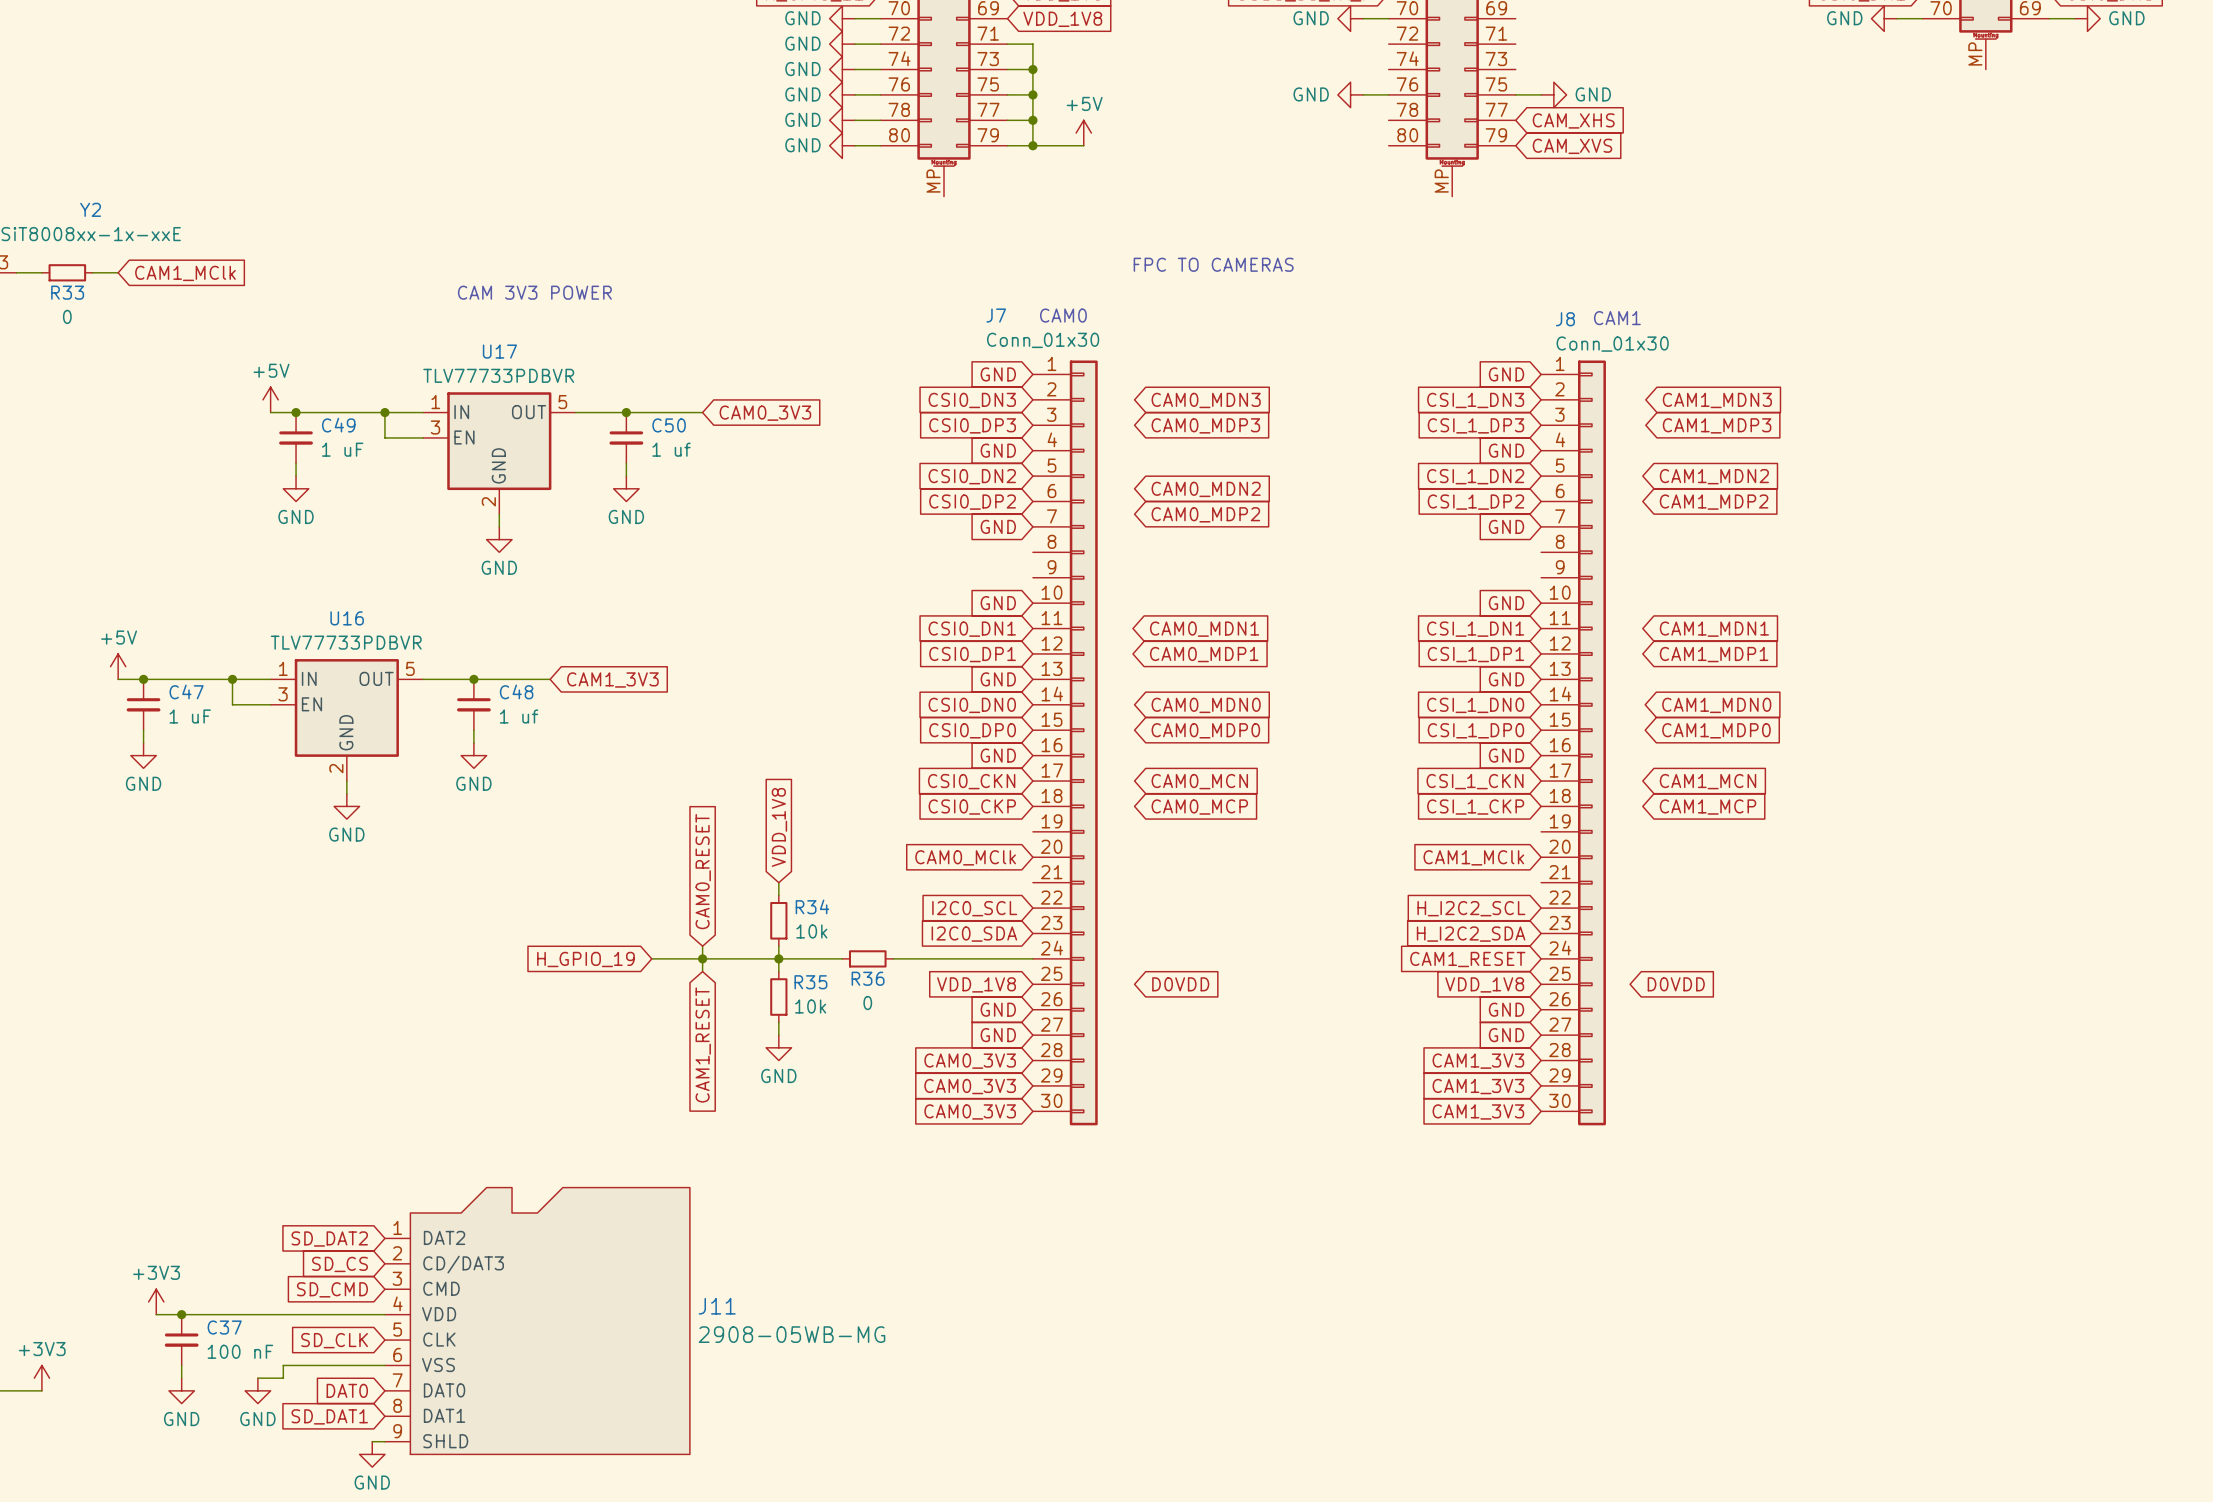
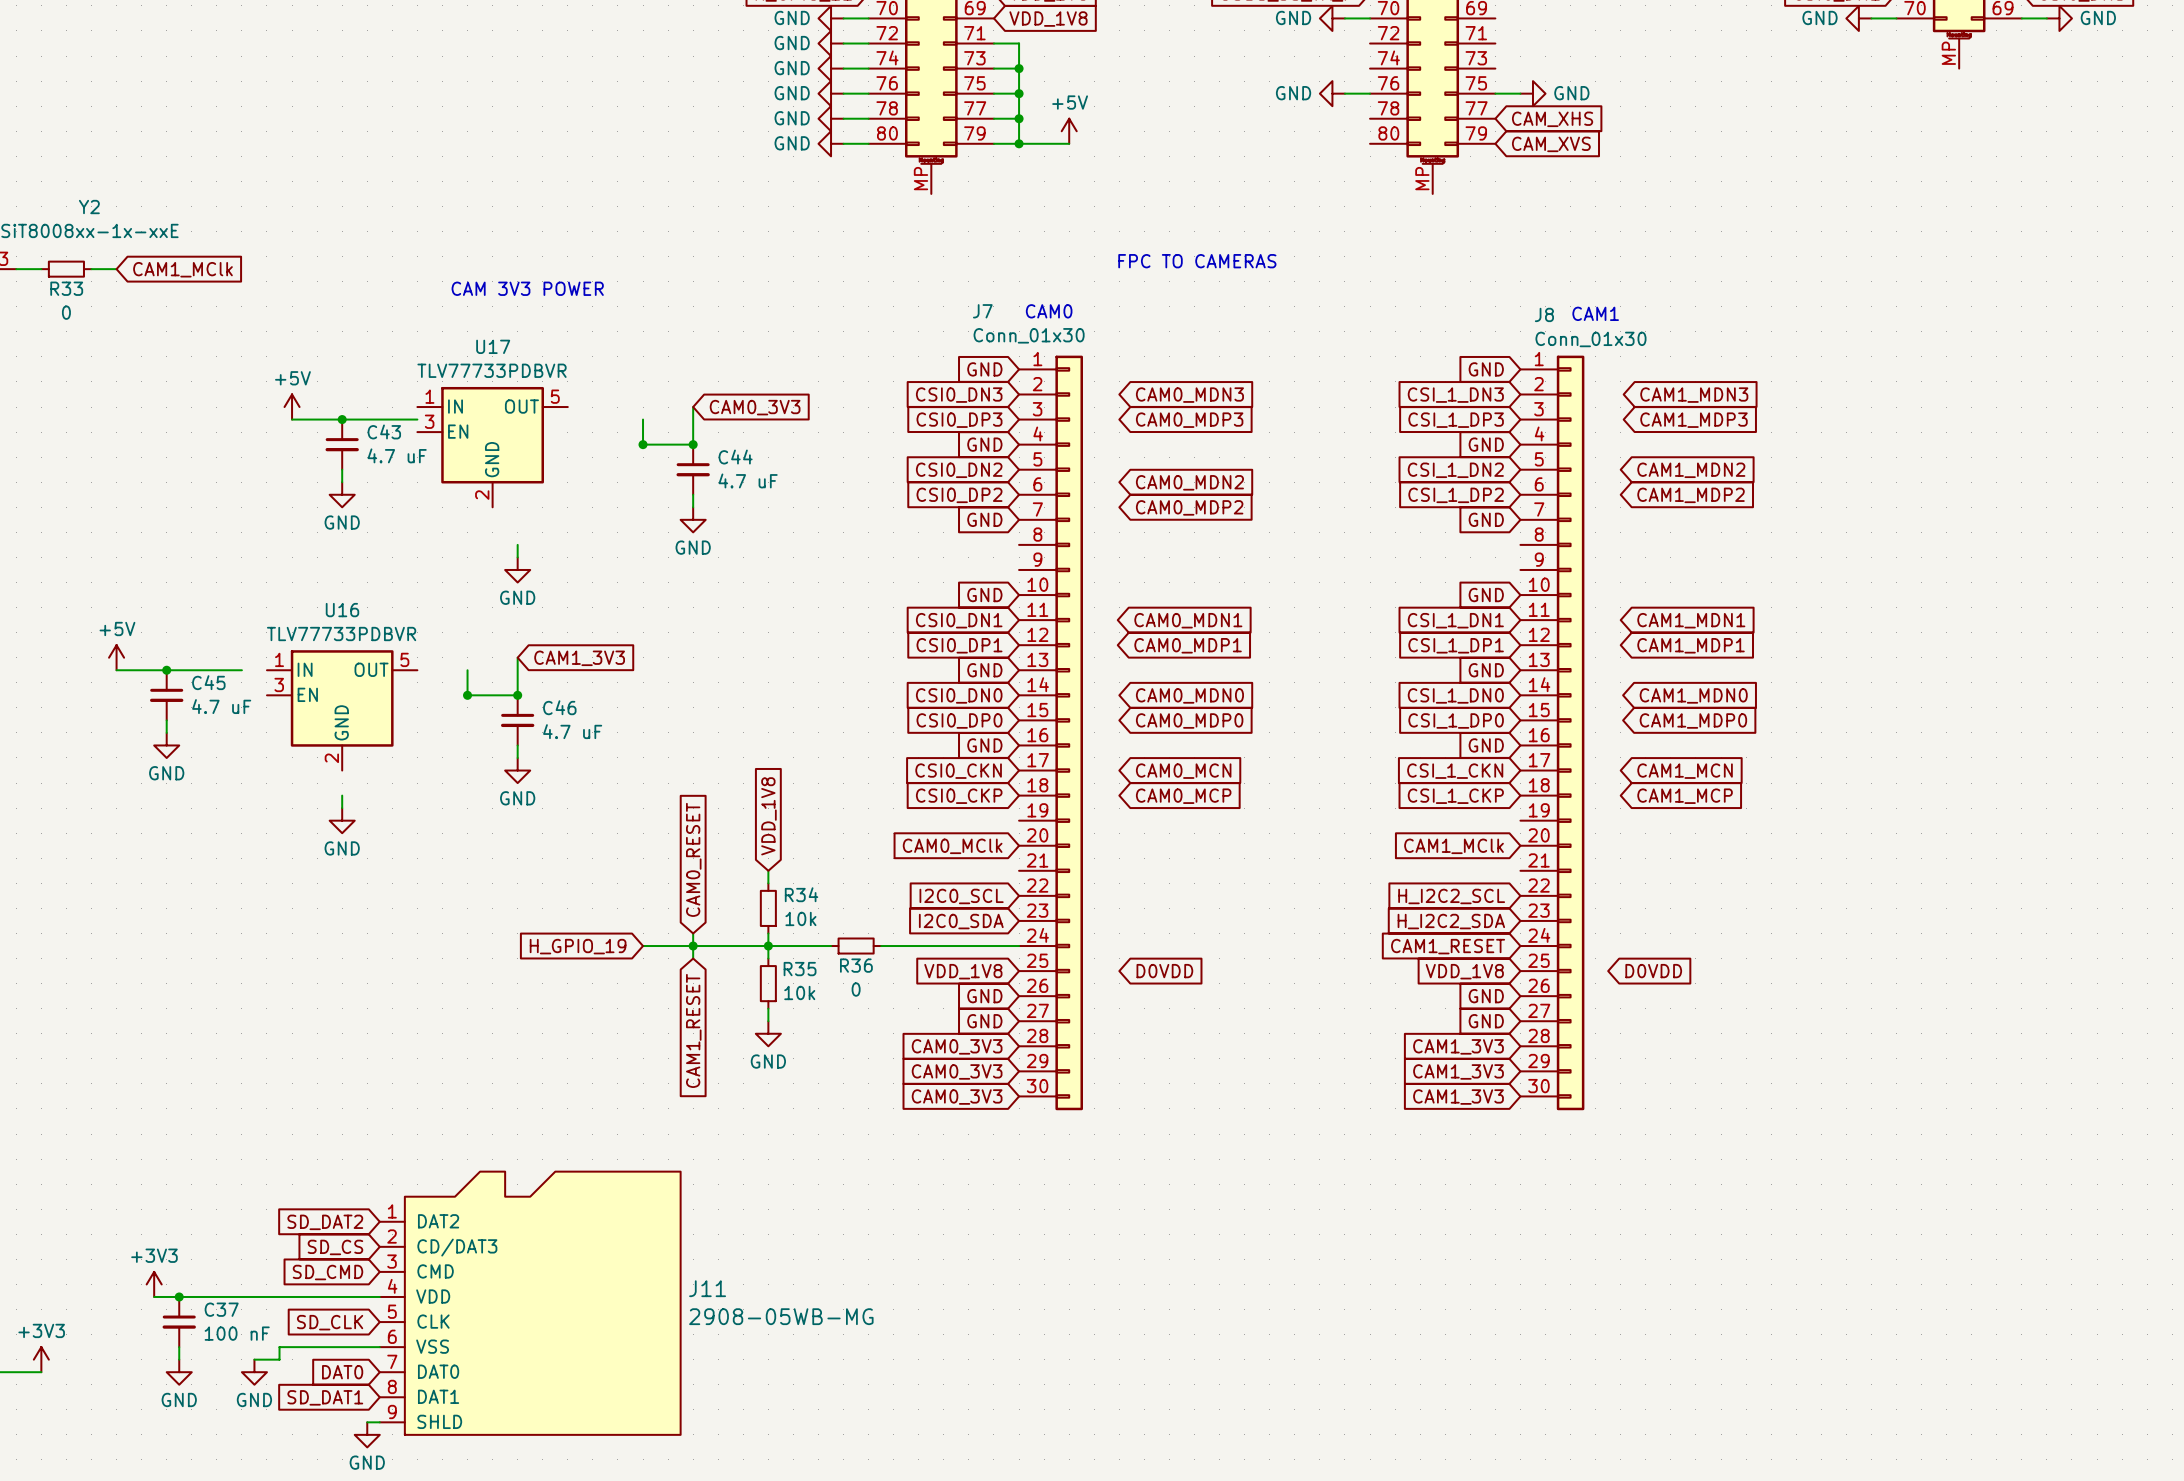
power symbol position: +5V (270, 399) -> +5V (292, 407)
wire: (270, 412) (423, 412) -> none
junction: (296, 412) -> none
wire: (384, 412) (384, 437) (423, 437) -> none
junction: (384, 412) -> none
wire: (575, 412) (702, 412) -> (643, 419) (643, 444) (693, 444) (693, 407)
junction: (626, 412) -> none
wire: none -> (292, 419) (417, 419)
junction: none -> (342, 419)
C49: 1 uF (296, 437) -> none
C50: 1 uf (626, 437) -> none
C43: none -> 4.7 uF (342, 444)
junction: none -> (643, 444)
junction: none -> (693, 444)
wire: (296, 463) (296, 476) -> (342, 469) (342, 482)
wire: (626, 463) (626, 476) -> (693, 494) (693, 507)
C44: none -> 4.7 uF (693, 469)
power symbol position: GND (296, 488) -> GND (342, 494)
power symbol: GND (626, 488) -> none
wire: (499, 514) (499, 526) -> (517, 544) (517, 557)
power symbol: none -> GND (693, 519)
power symbol position: GND (499, 539) -> GND (517, 569)
wire: none -> (517, 657) (517, 695) (467, 695) (467, 670)
junction position: (143, 679) -> (166, 670)
wire: (232, 679) (232, 704) (270, 704) -> none
junction: (232, 679) -> none
wire: (245, 679) (270, 679) -> none
wire: (423, 679) (550, 679) -> none
junction position: (473, 679) -> (467, 695)
global label position: CAM1_3V3 (612, 679) -> CAM1_3V3 (579, 658)
C47: 1 uF (143, 704) -> none
C45: none -> 4.7 uF (166, 695)
C48: 1 uf (473, 704) -> none
junction: none -> (517, 695)
wire: (143, 730) (143, 742) -> (166, 720) (166, 732)
wire: (473, 730) (473, 742) -> (517, 745) (517, 757)
C46: none -> 4.7 uF (517, 720)
power symbol position: GND (143, 755) -> GND (166, 745)
power symbol position: GND (473, 755) -> GND (517, 770)
wire: (346, 781) (346, 793) -> (342, 795) (342, 808)
power symbol position: GND (346, 806) -> GND (342, 820)

